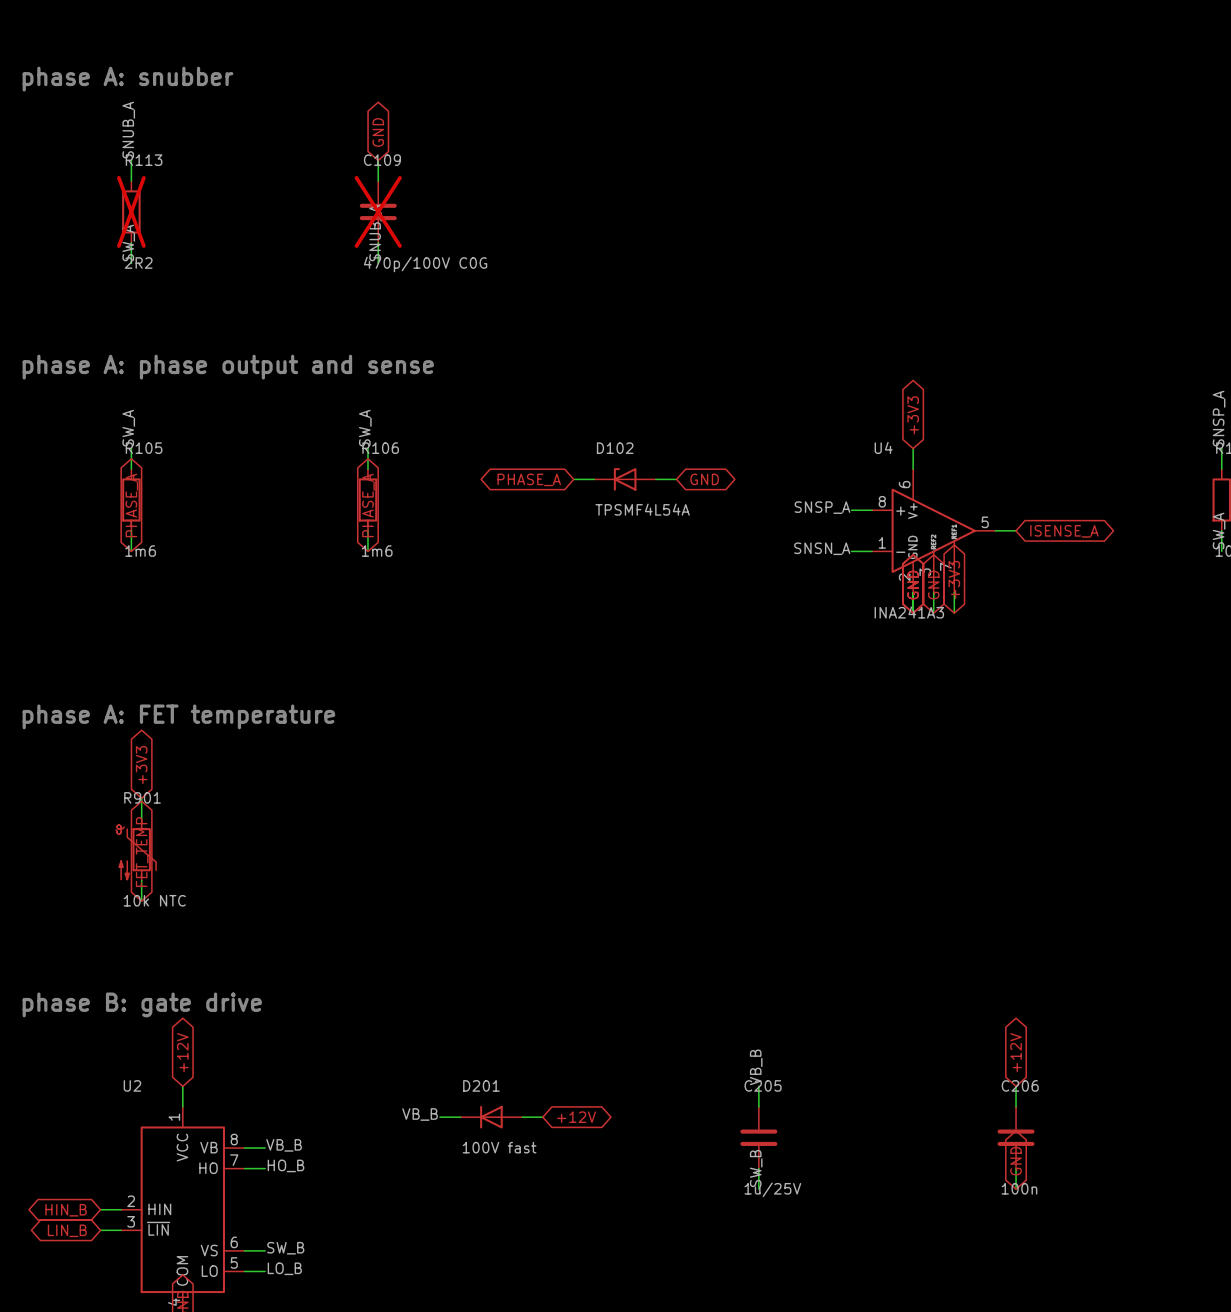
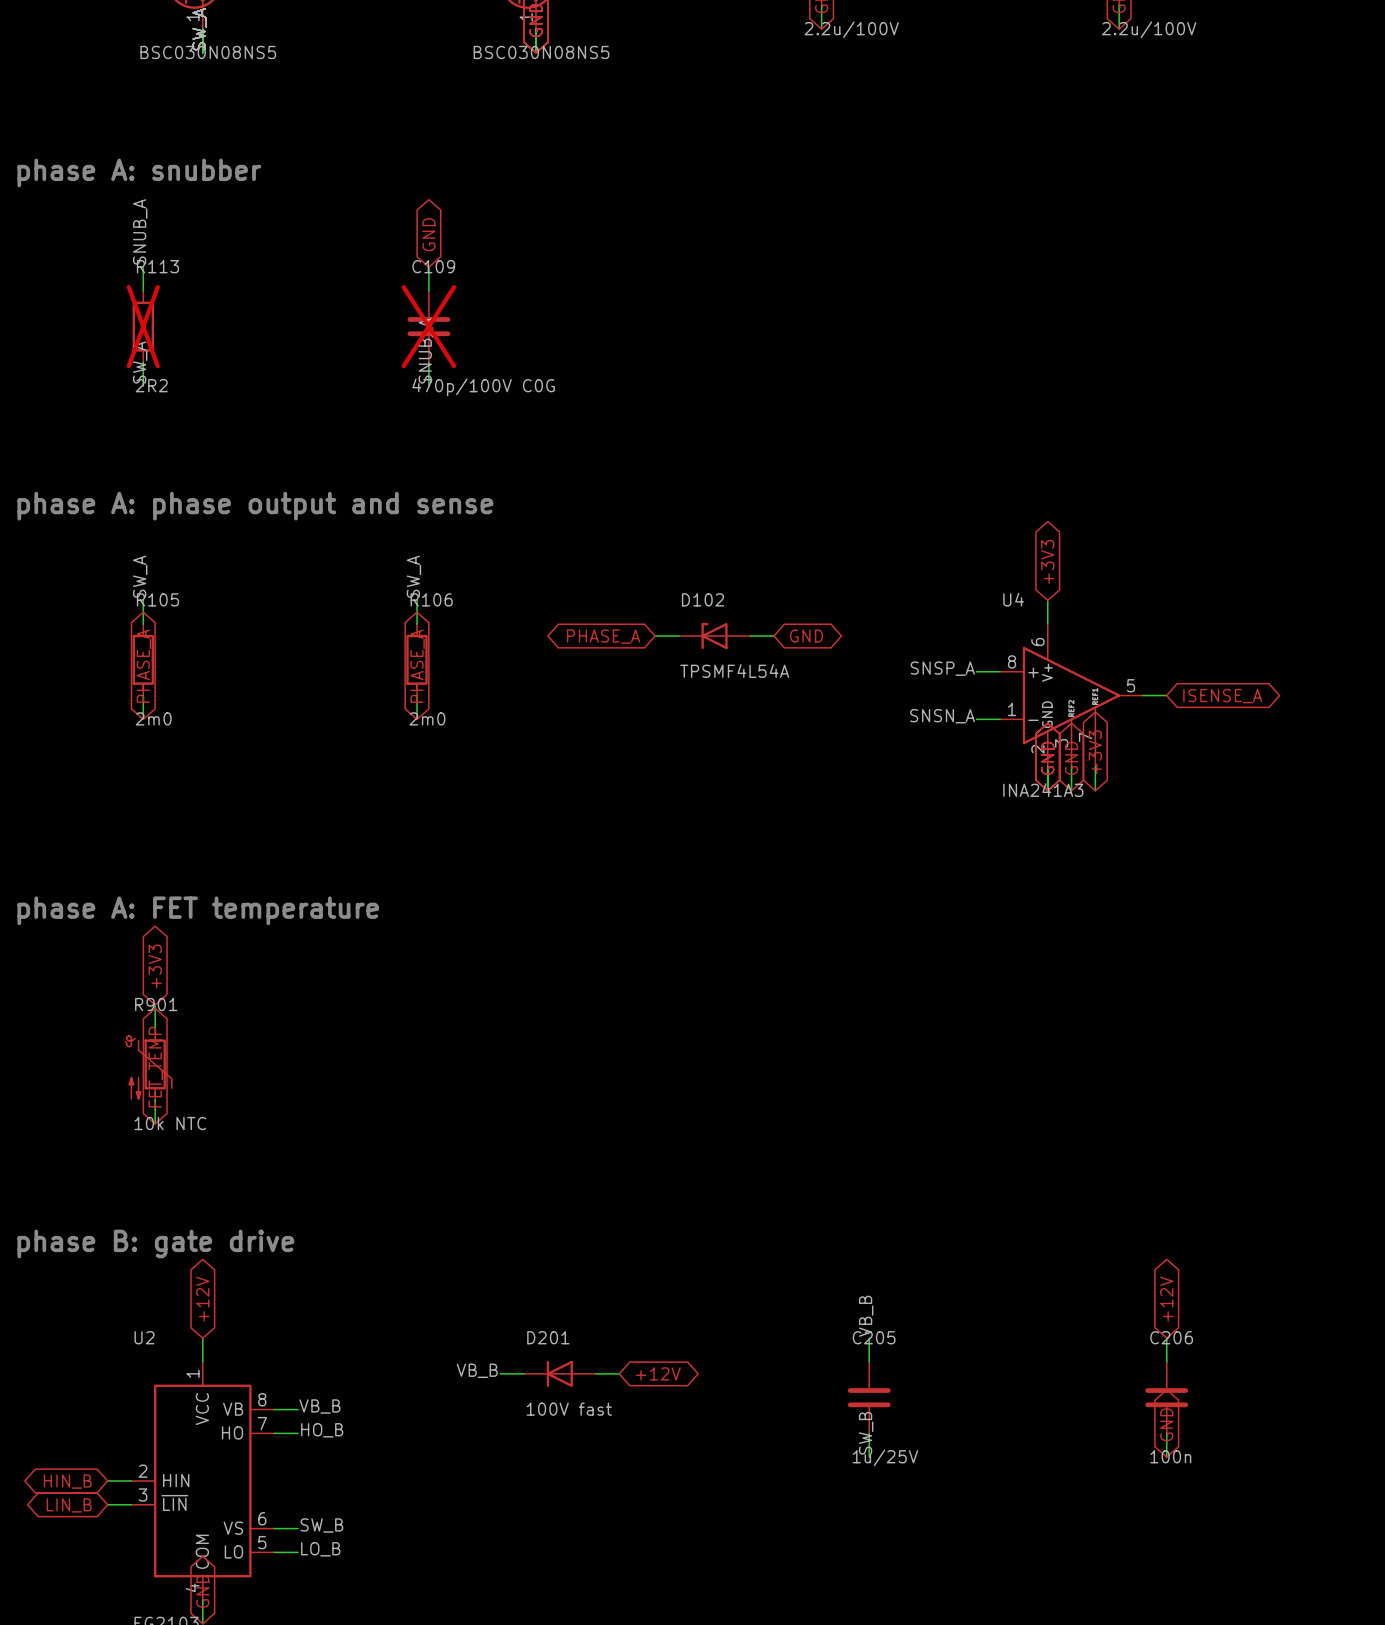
R105 value: 1m6 (140, 551) -> 2m0 (153, 718)
R106 value: 1m6 (377, 551) -> 2m0 (427, 718)

